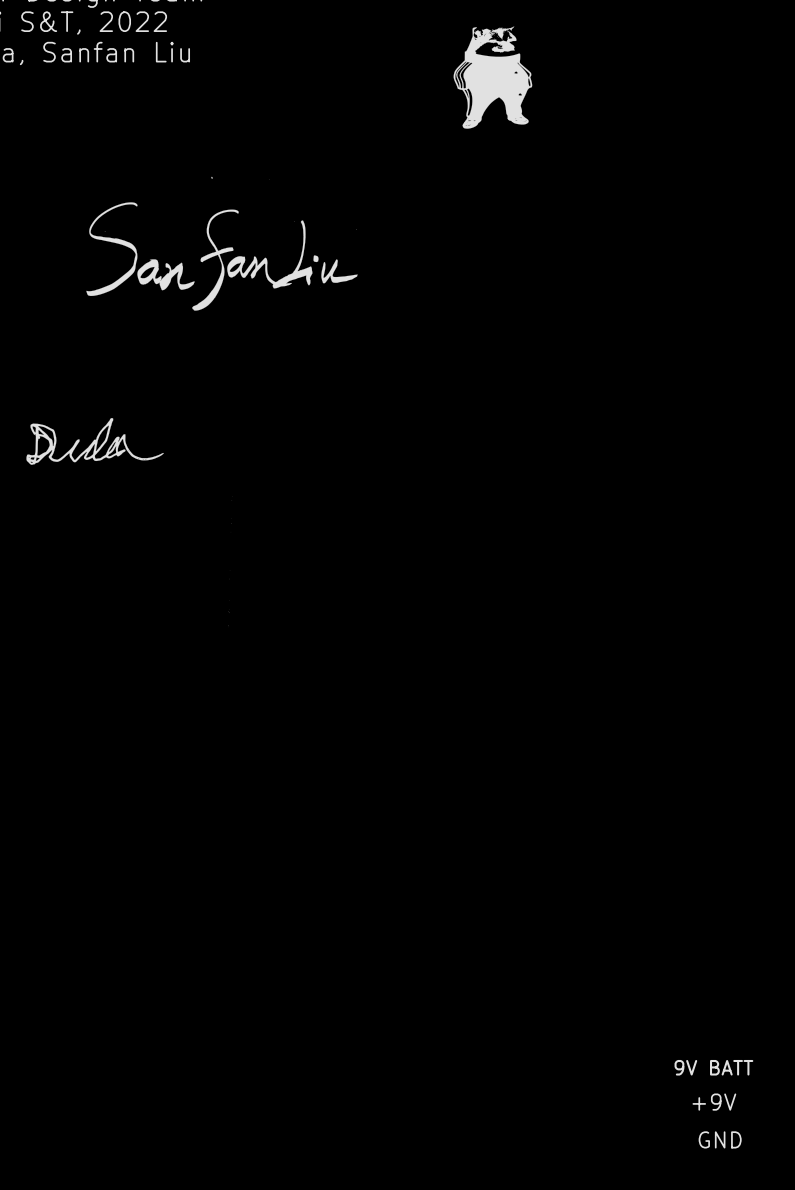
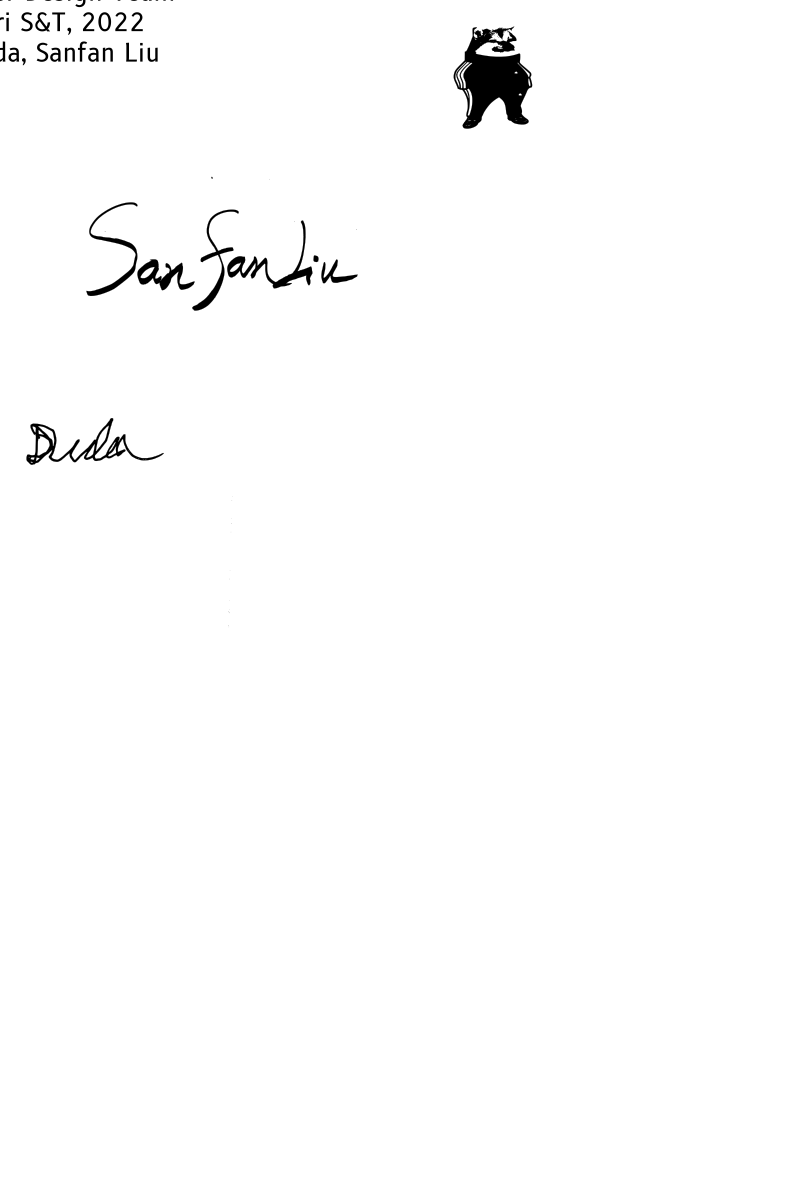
text: 9V BATT (713, 1067) -> none
text: +9V (714, 1102) -> none
text: GND (720, 1139) -> none

